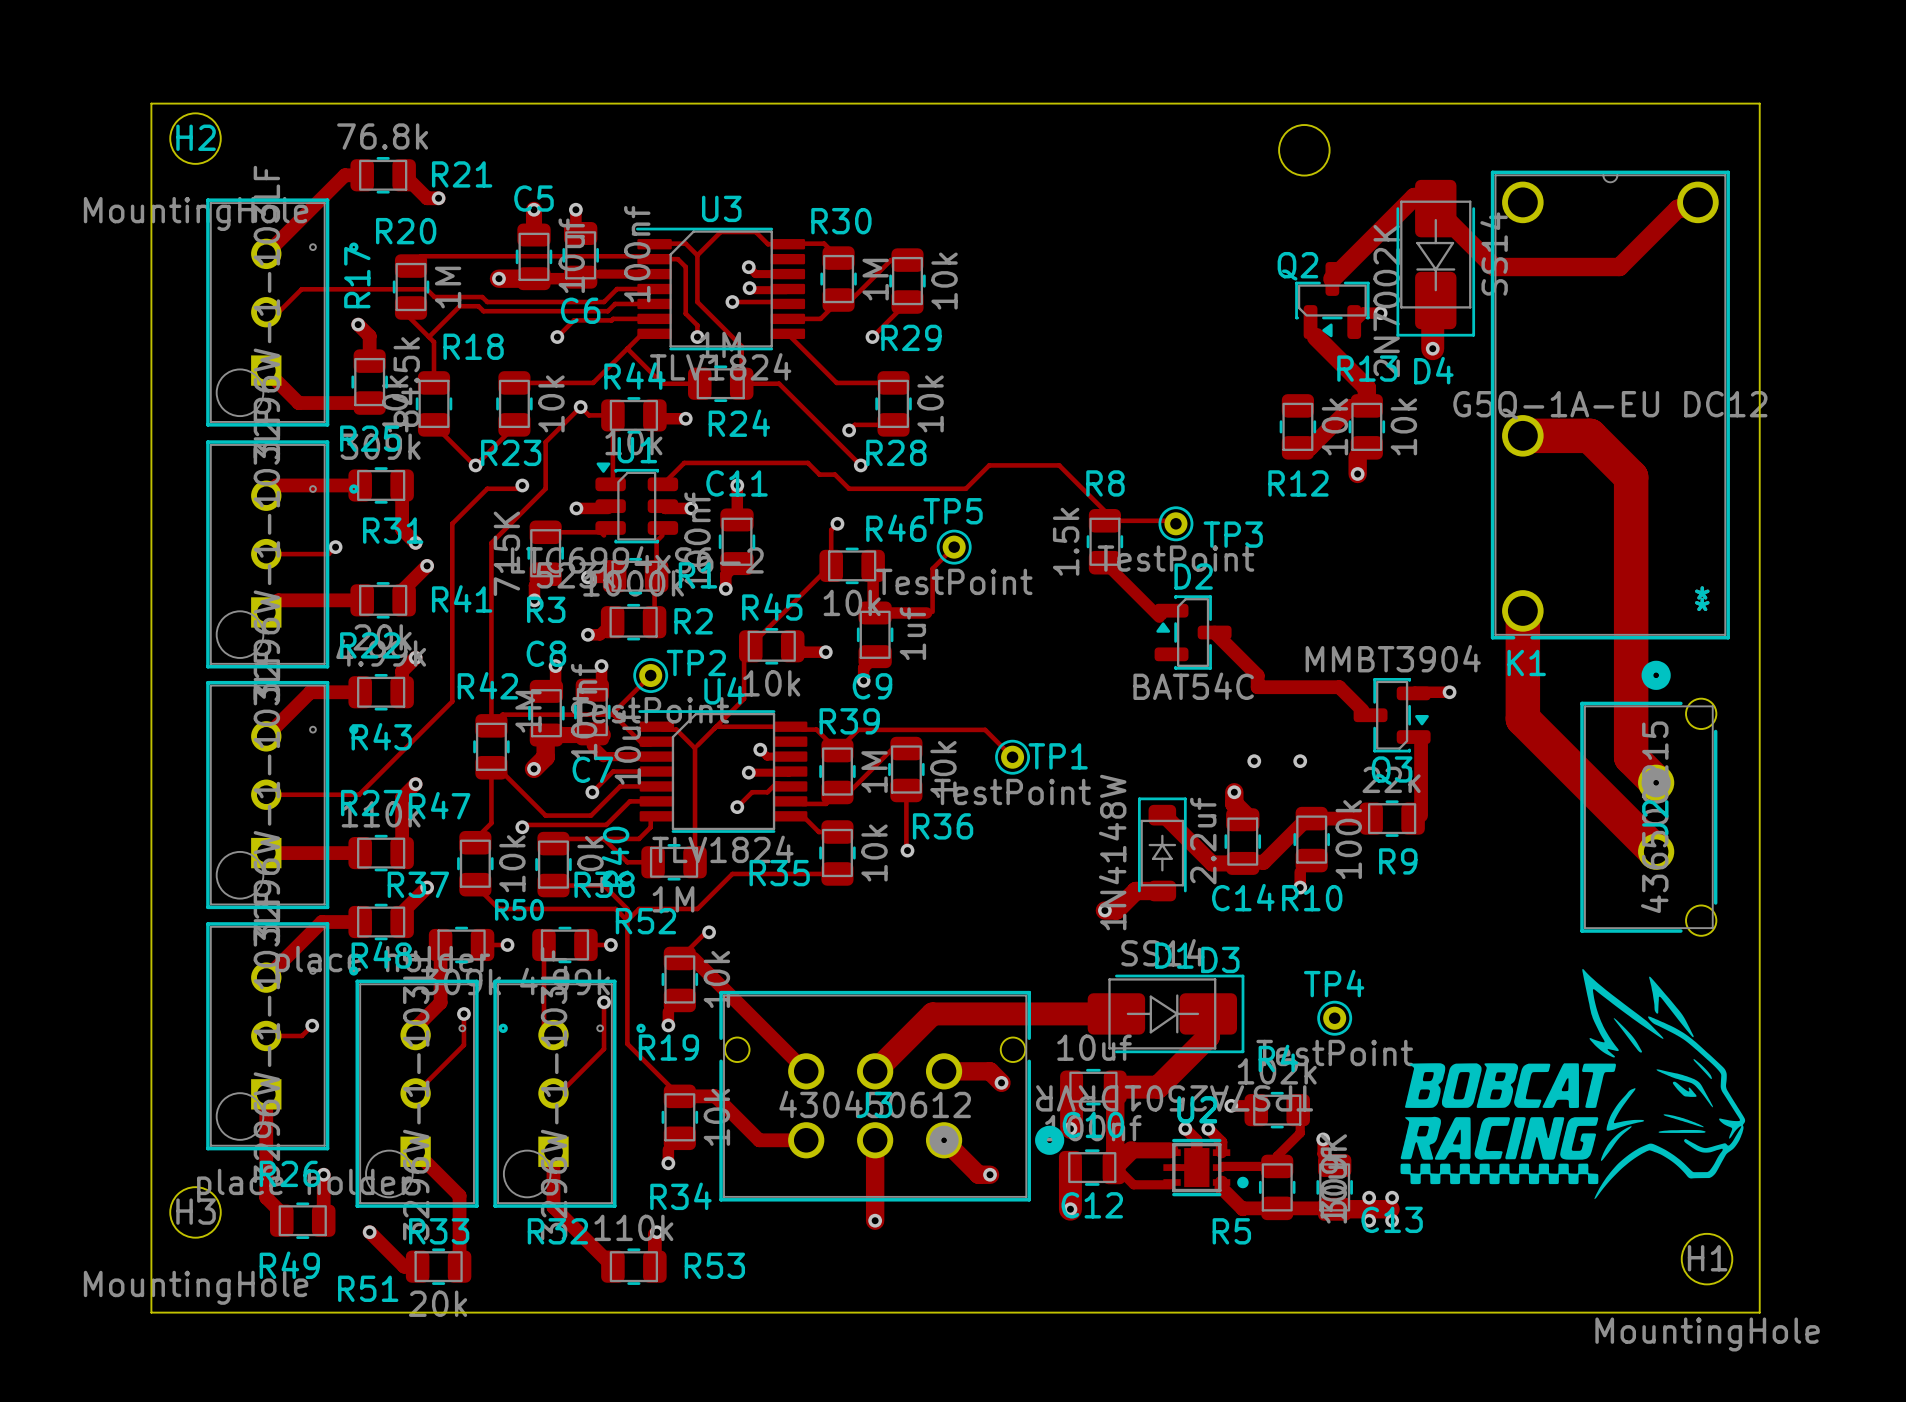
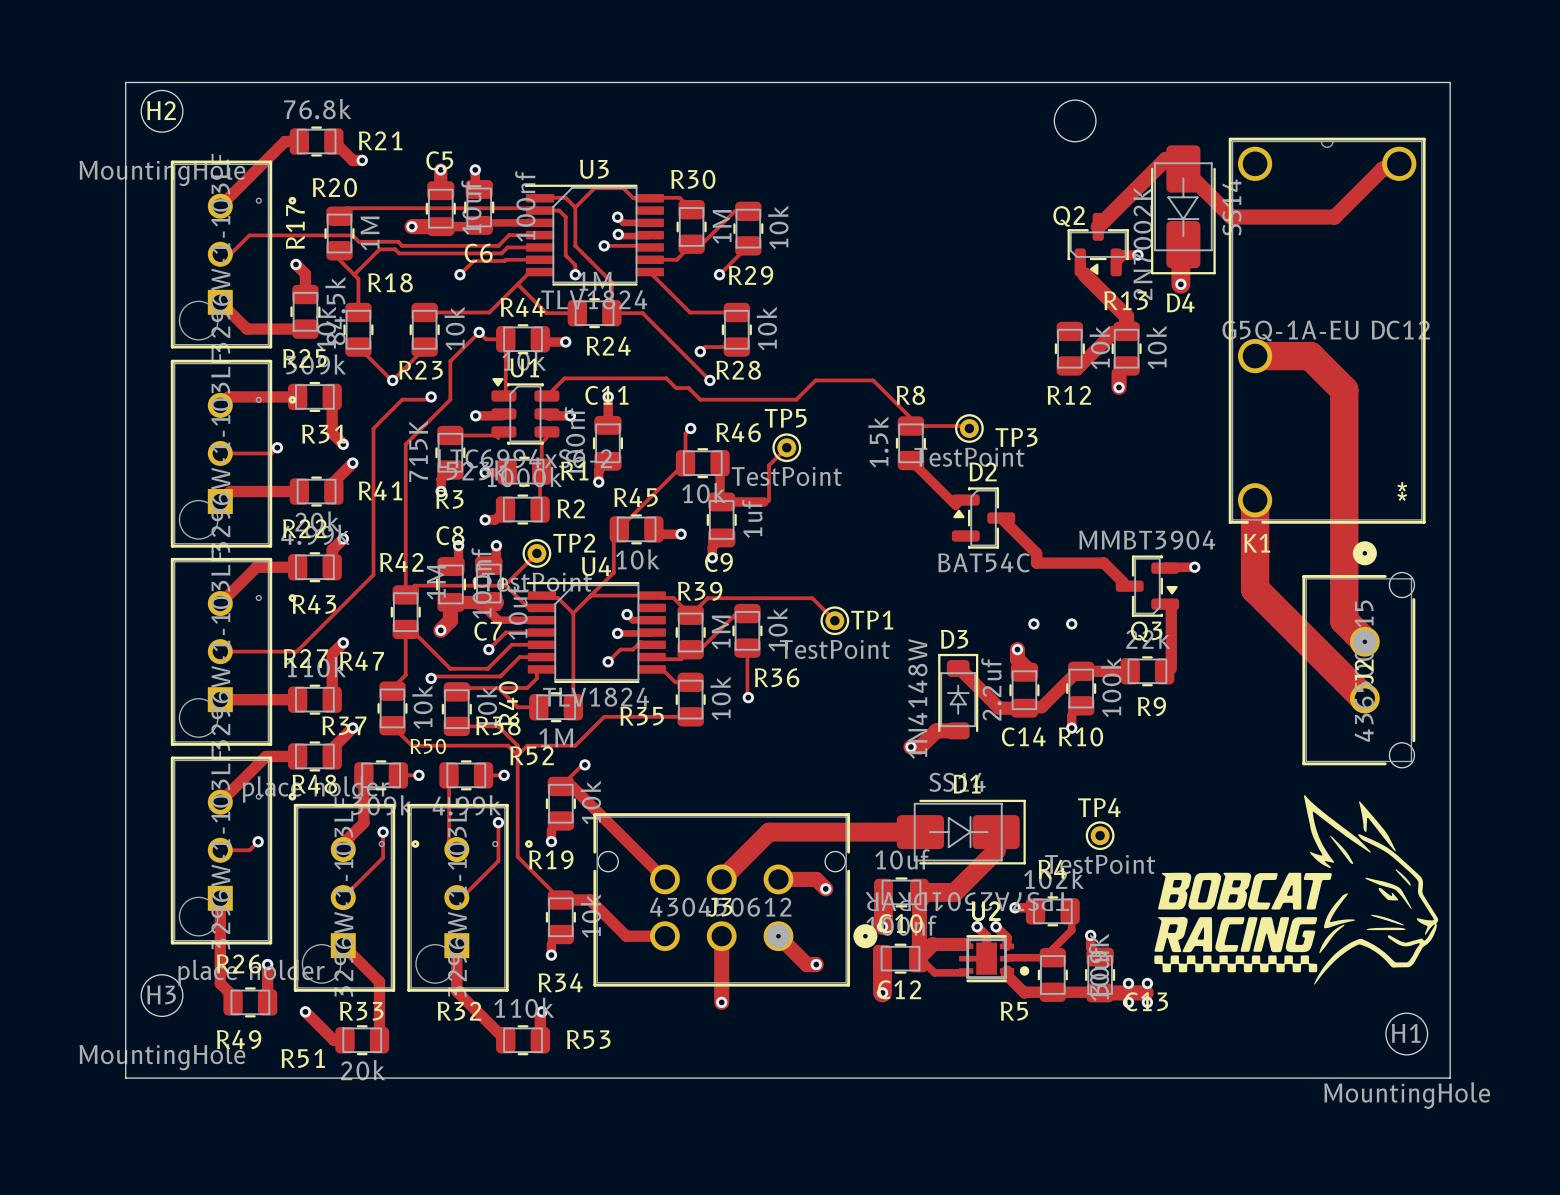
D3 name position: D3 (1220, 959) -> D3 (954, 639)

